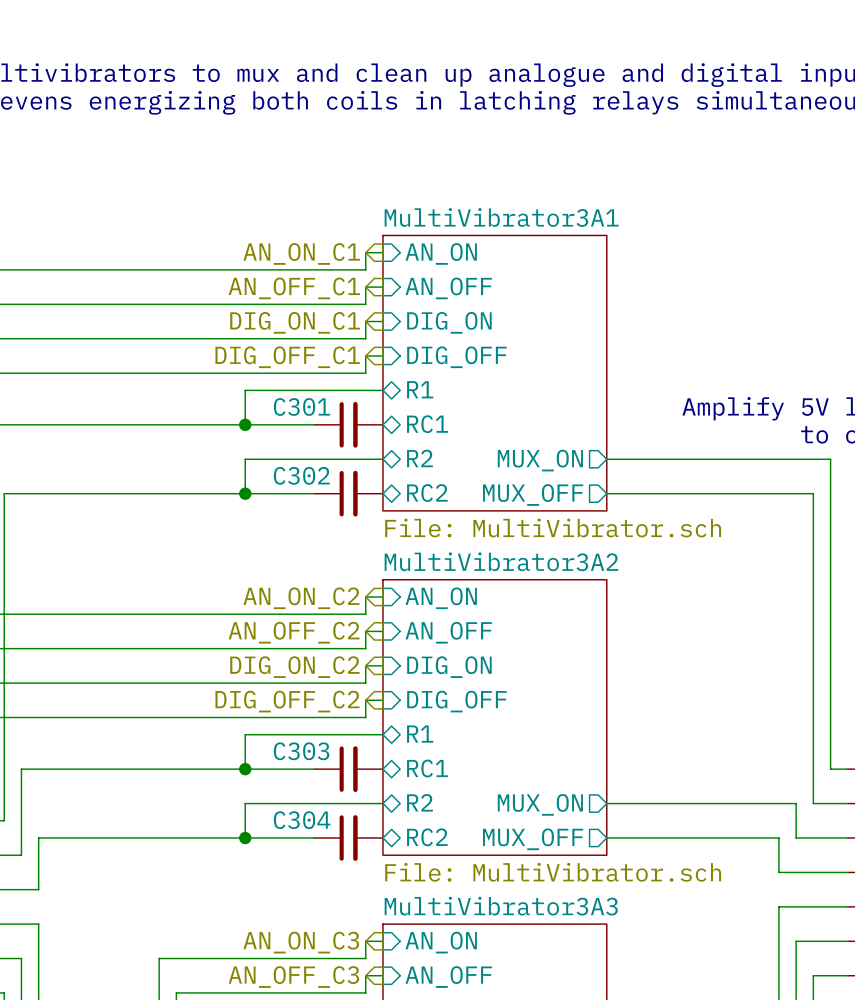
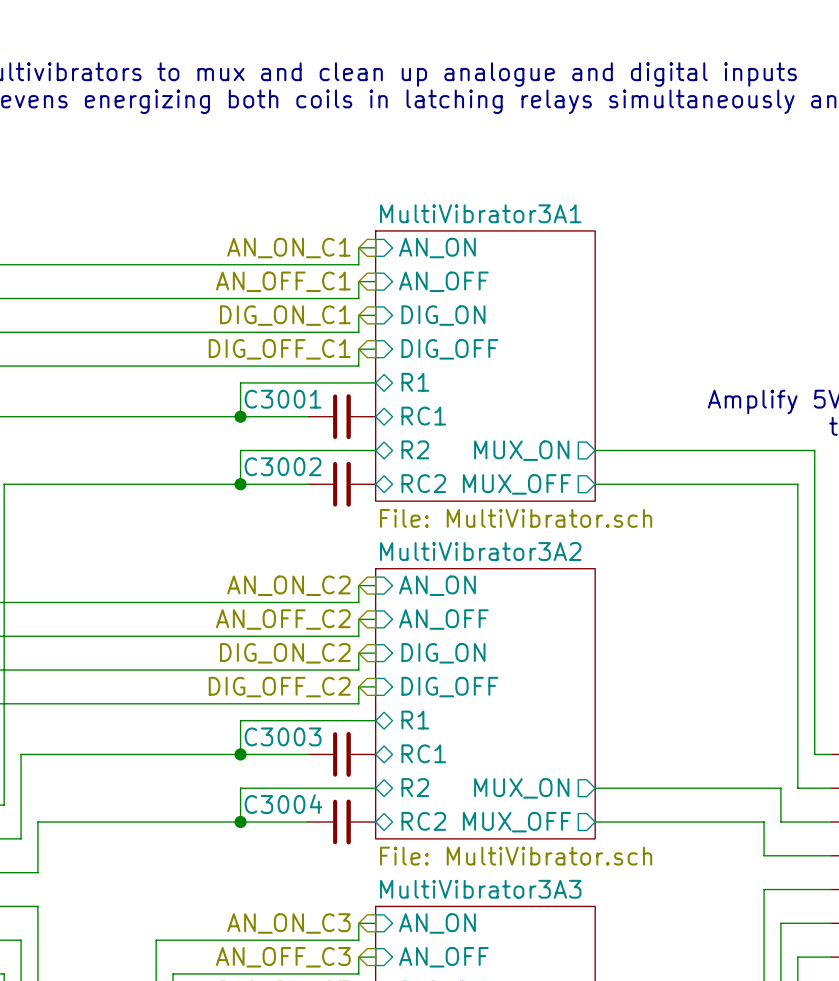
C301 name: C301 (302, 406) -> C3001 (283, 399)
C302 name: C302 (301, 475) -> C3002 (283, 466)
C303 name: C303 (301, 751) -> C3003 (283, 736)
C304 name: C304 (302, 820) -> C3004 (283, 804)

